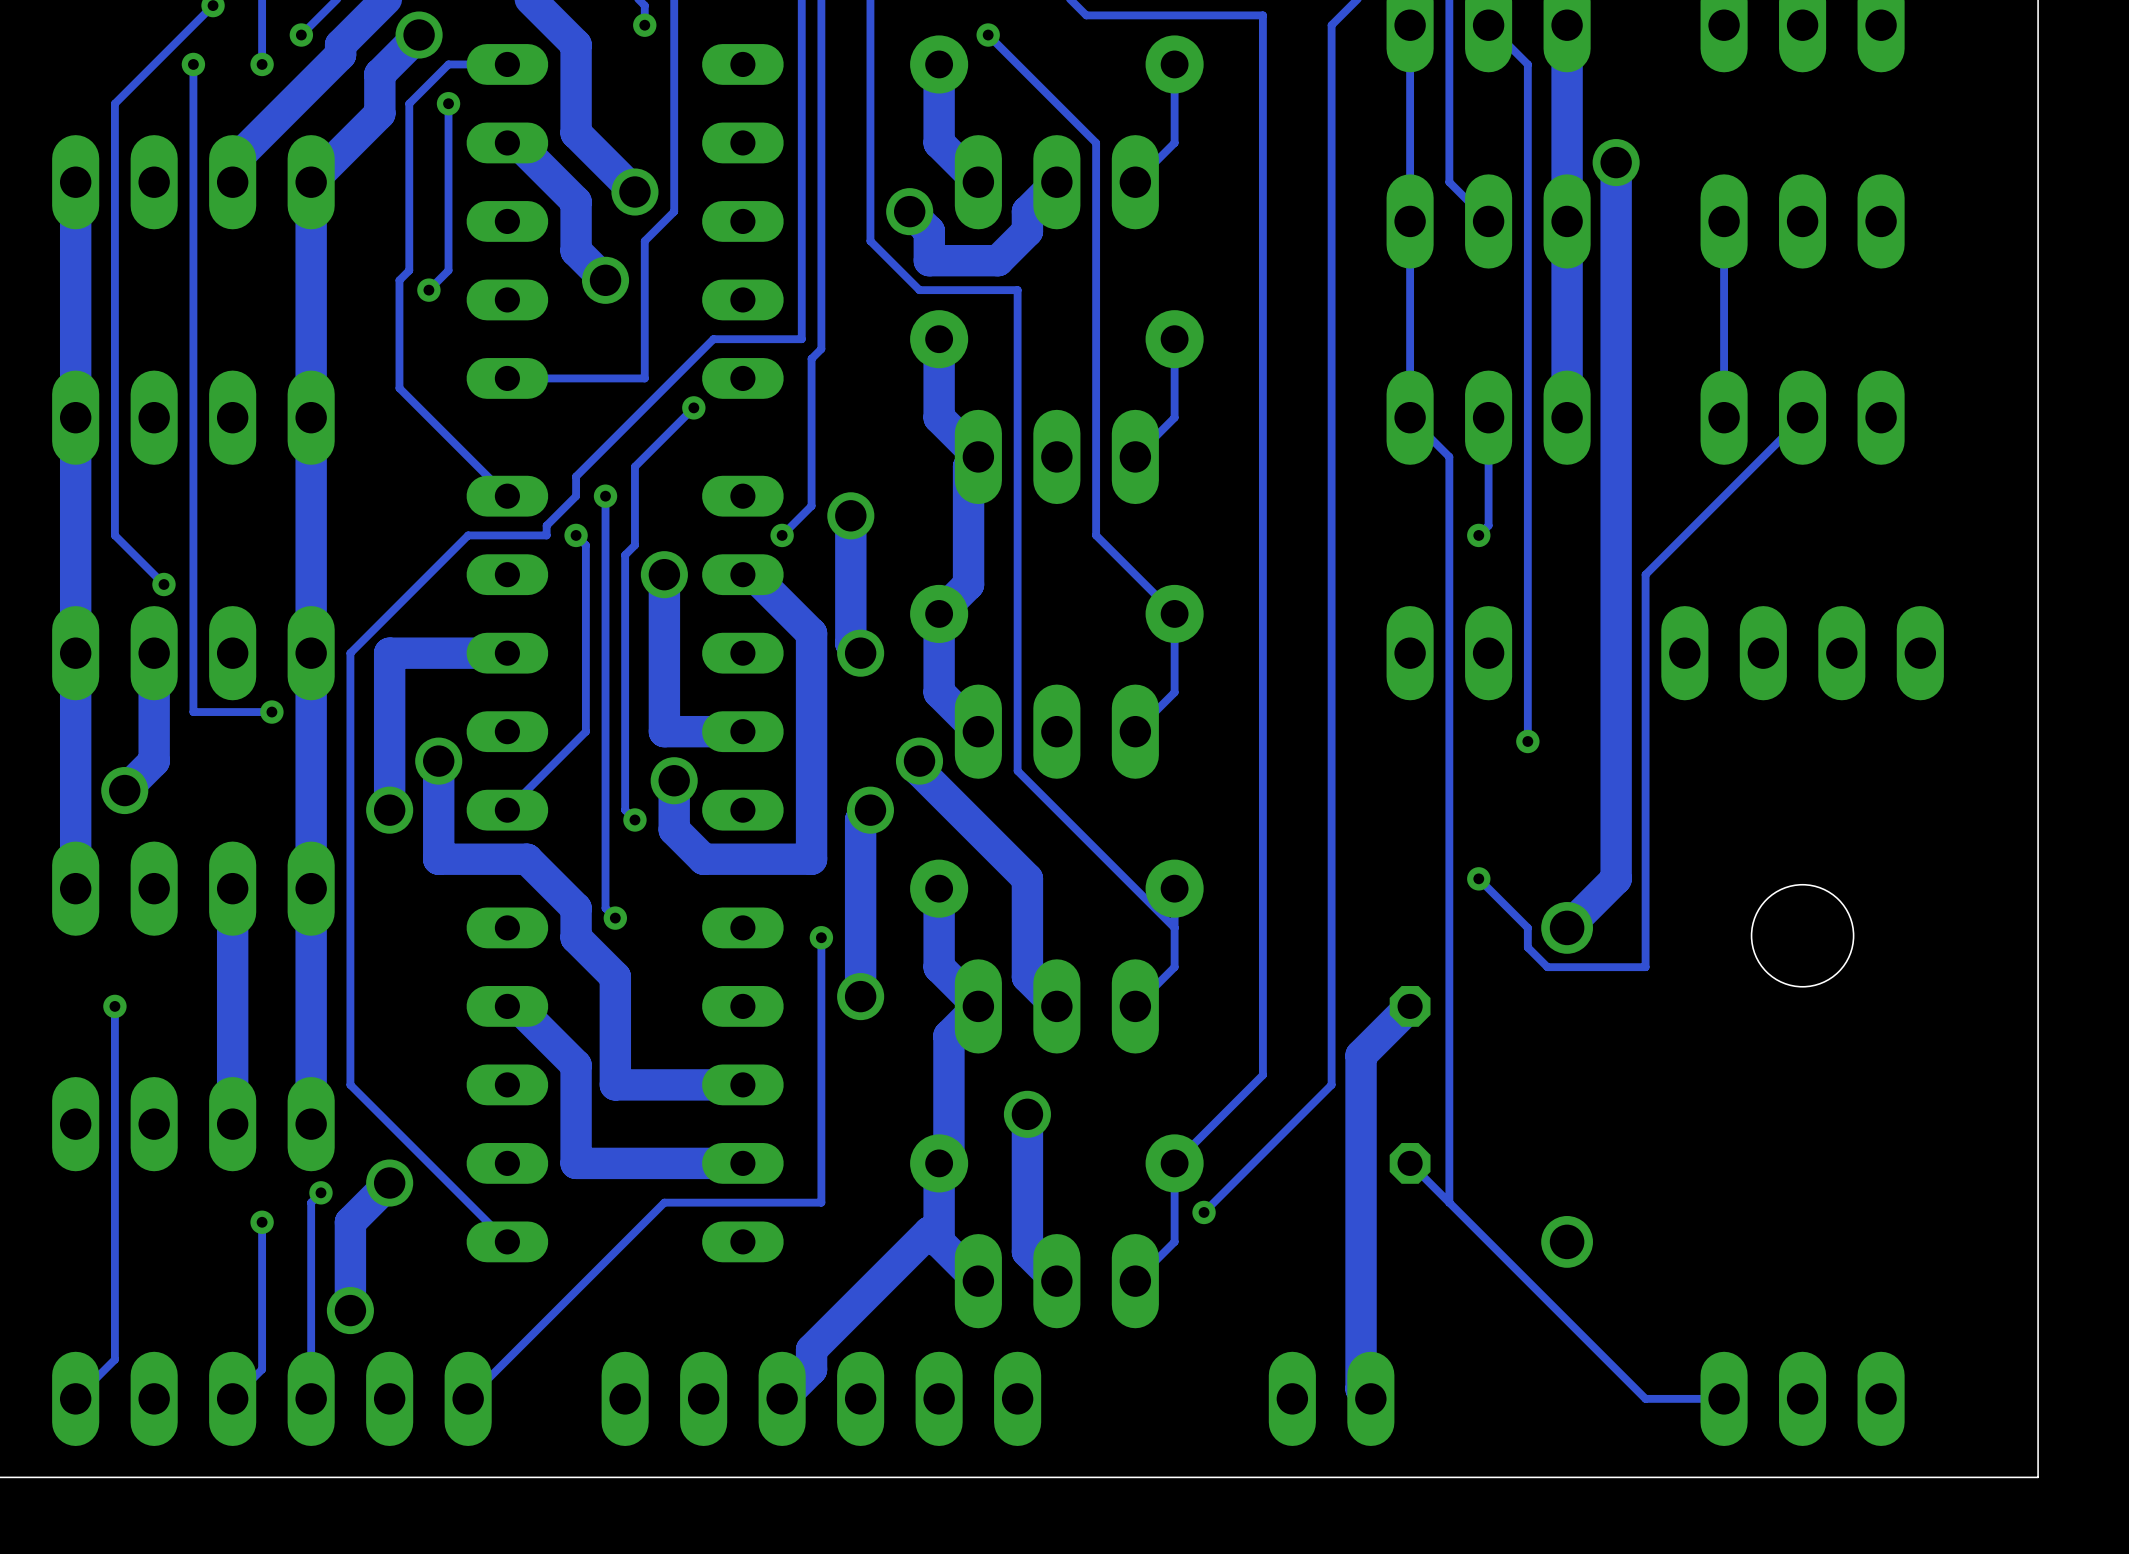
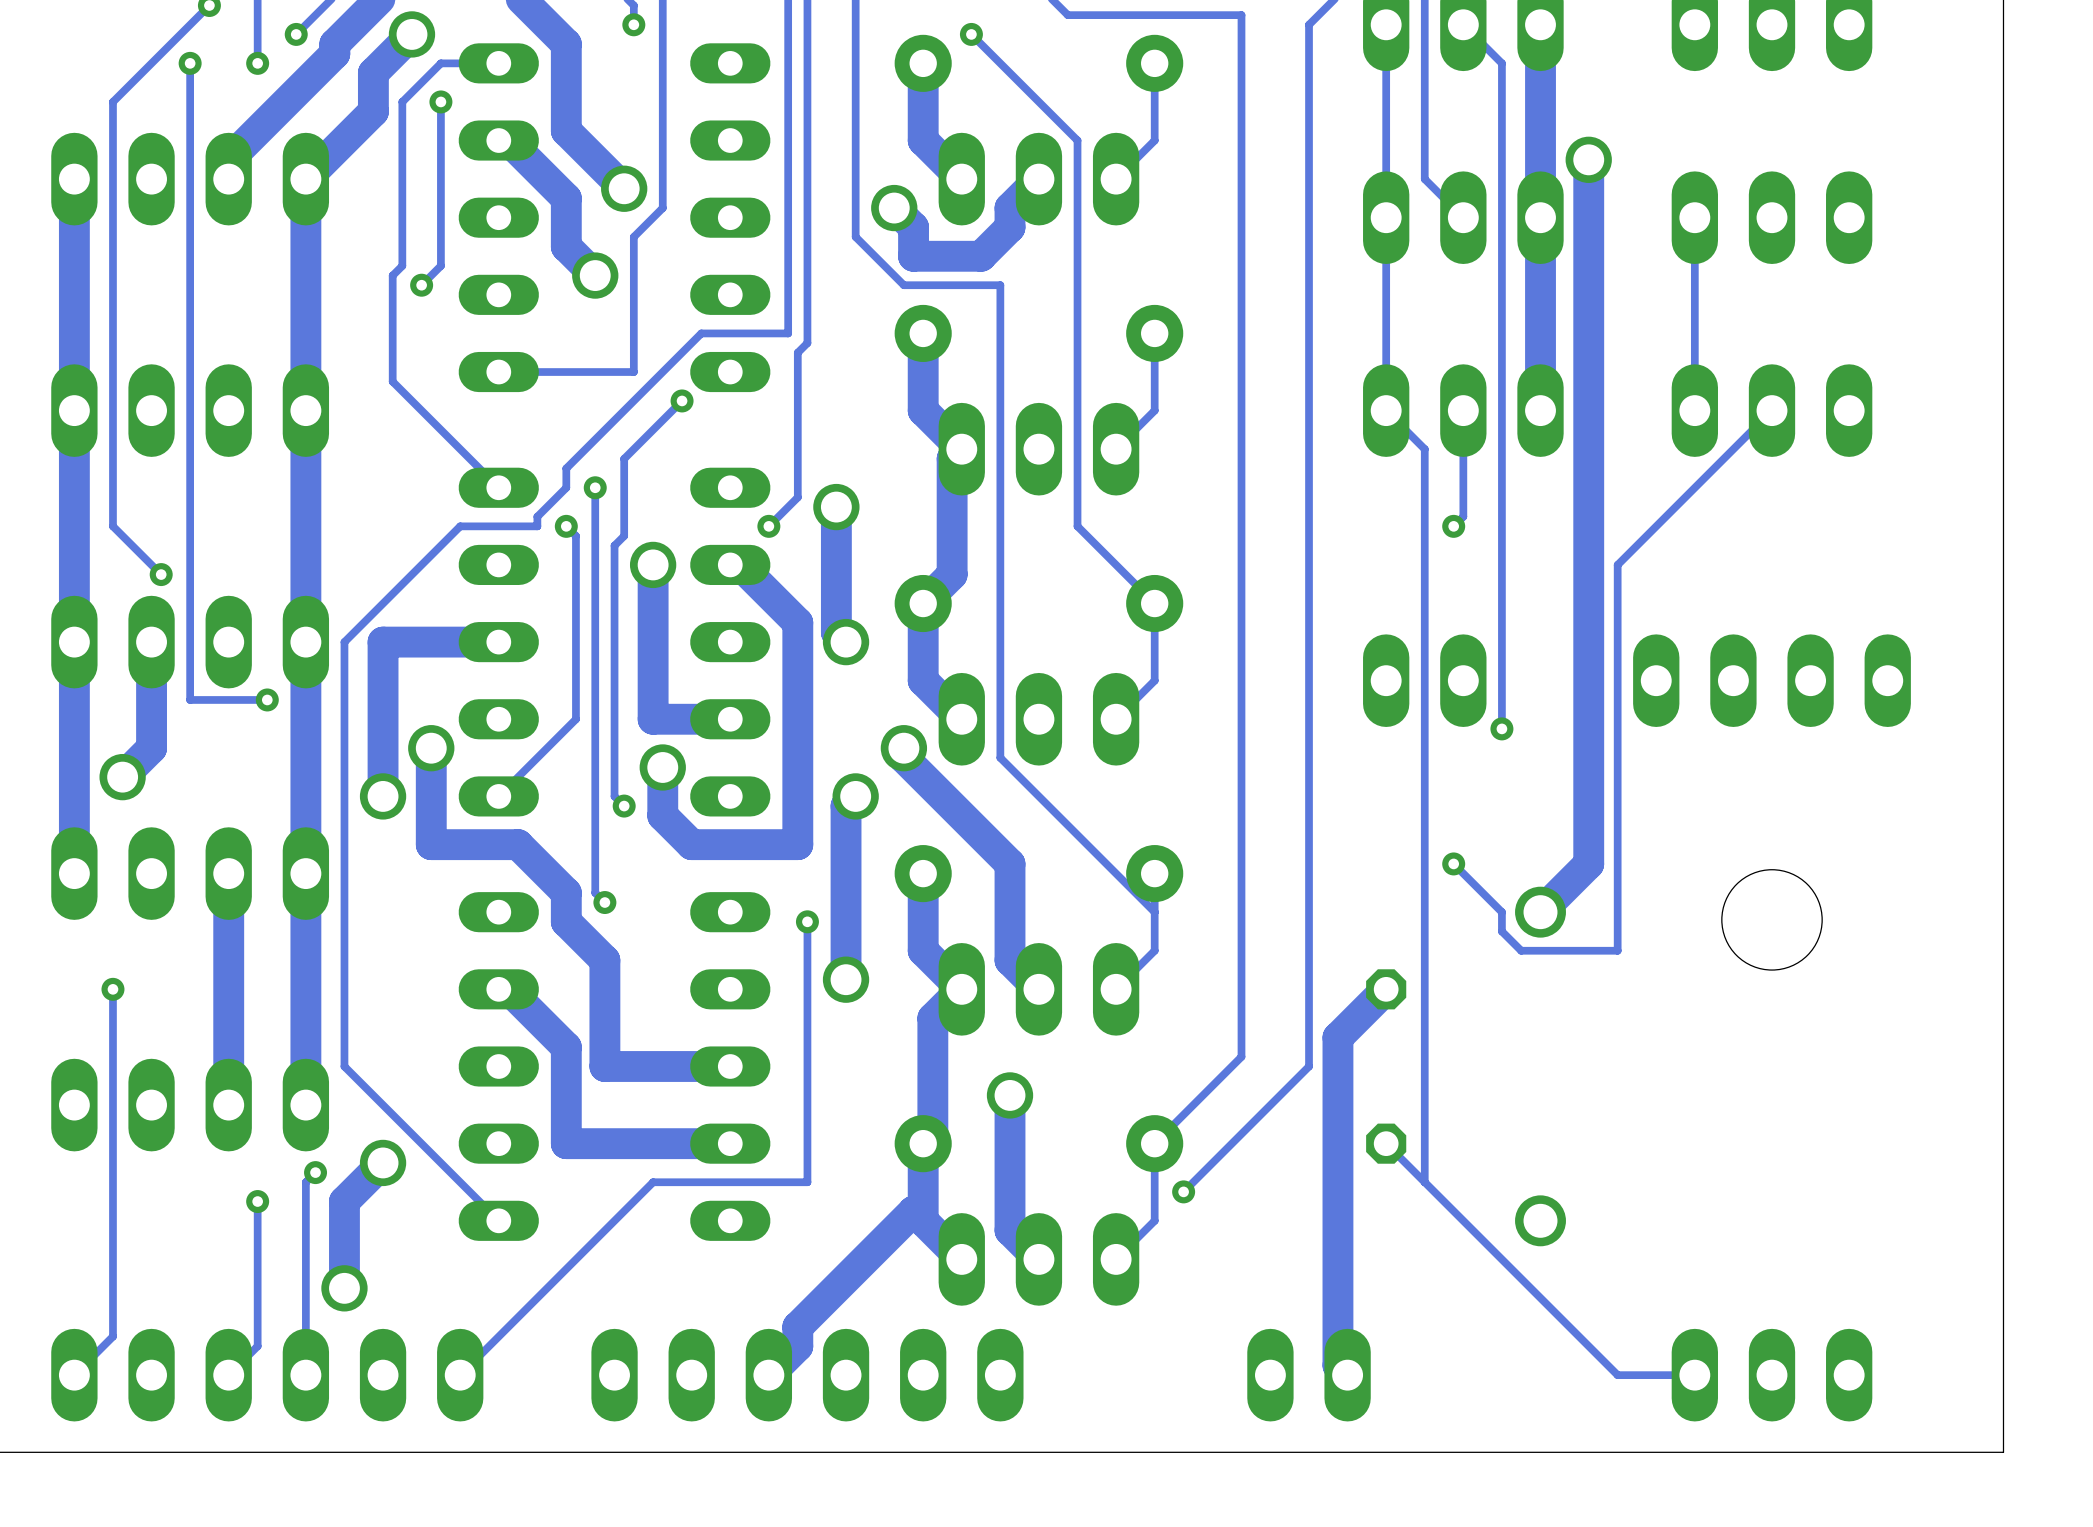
part position: (1449, 653) -> (1424, 680)
part position: (1802, 653) -> (1772, 680)

